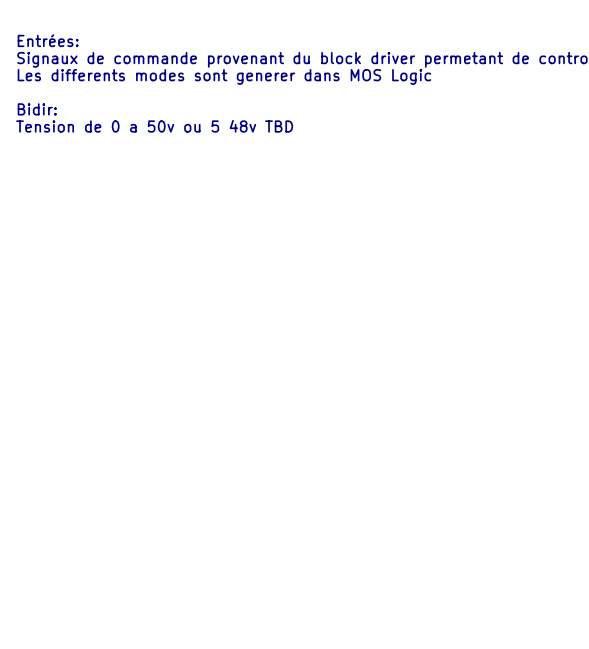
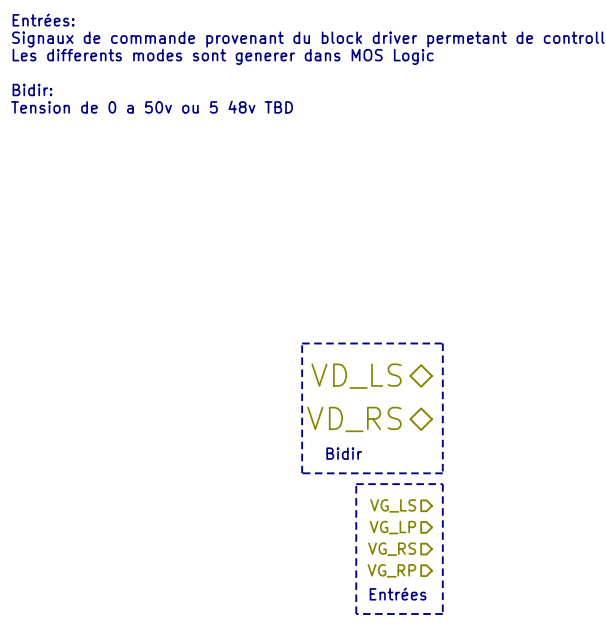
line: none -> (302, 343) (302, 473) (442, 473) (442, 343) (302, 343)
hierarchical label: none -> VD_LS (356, 376)
hierarchical label: none -> VD_RS (354, 419)
text: none -> Bidir (344, 453)
line: none -> (356, 484) (356, 613) (442, 613) (442, 484) (356, 484)
hierarchical label: none -> VG_LS (393, 505)
hierarchical label: none -> VG_LP (392, 527)
hierarchical label: none -> VG_RS (392, 549)
hierarchical label: none -> VG_RP (391, 570)
text: none -> Entrées (398, 594)

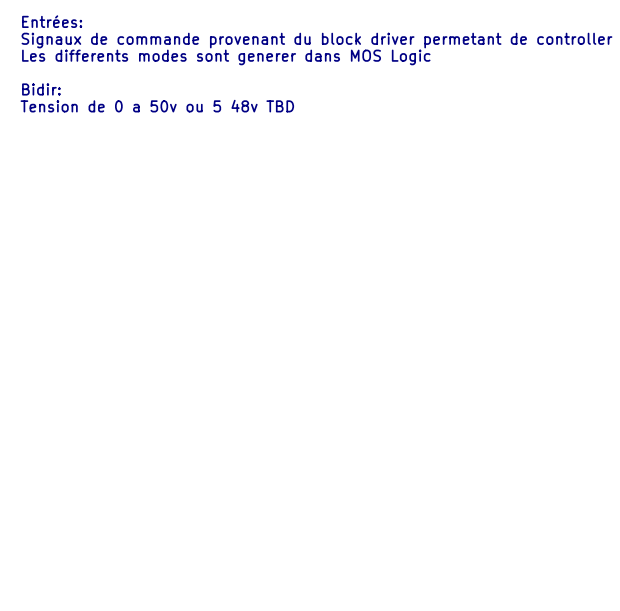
line: (302, 343) (302, 473) (442, 473) (442, 343) (302, 343) -> none
hierarchical label: VD_LS (356, 376) -> none
hierarchical label: VD_RS (354, 419) -> none
text: Bidir (344, 453) -> none
line: (356, 484) (356, 613) (442, 613) (442, 484) (356, 484) -> none
hierarchical label: VG_LS (393, 505) -> none
hierarchical label: VG_LP (392, 527) -> none
hierarchical label: VG_RS (392, 549) -> none
hierarchical label: VG_RP (391, 570) -> none
text: Entrées (398, 594) -> none

